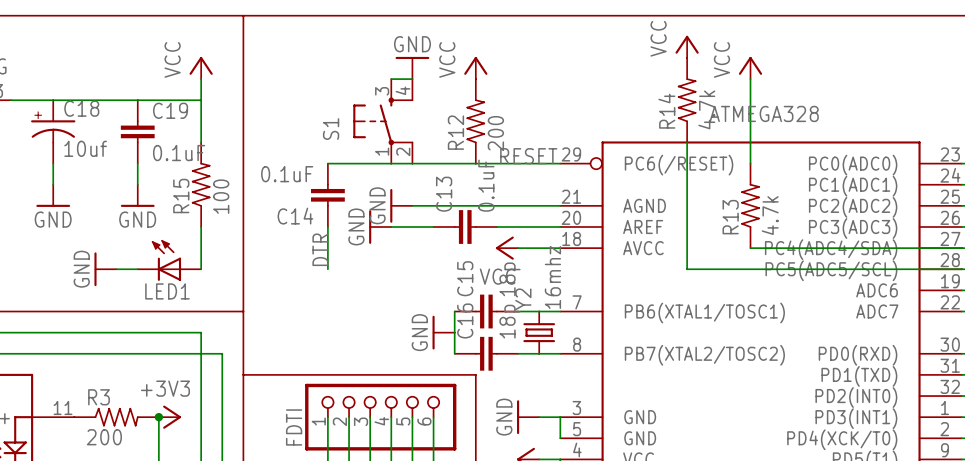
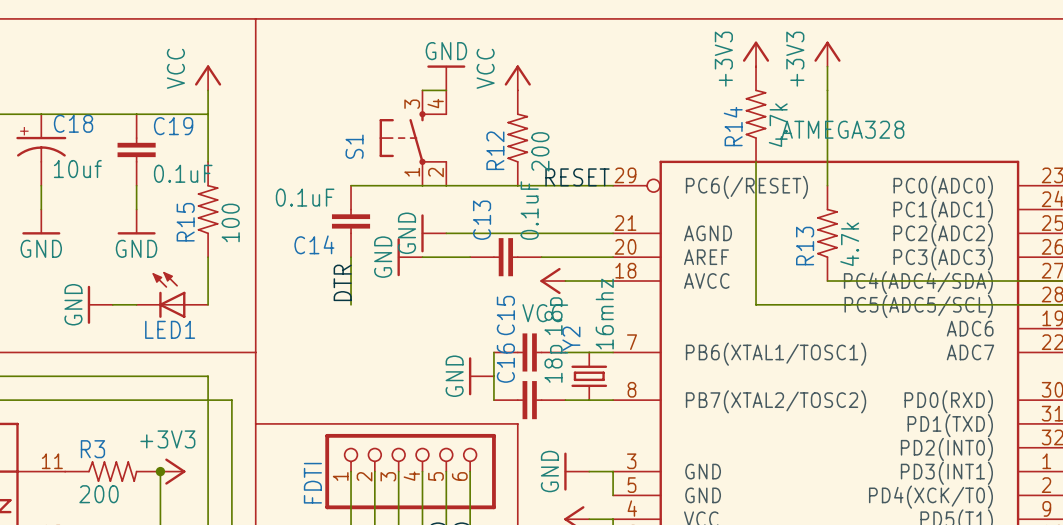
power symbol: VCC (687, 46) -> +3V3 (756, 54)
power symbol: none -> +3V3 (827, 54)
power symbol: VCC (750, 68) -> none

